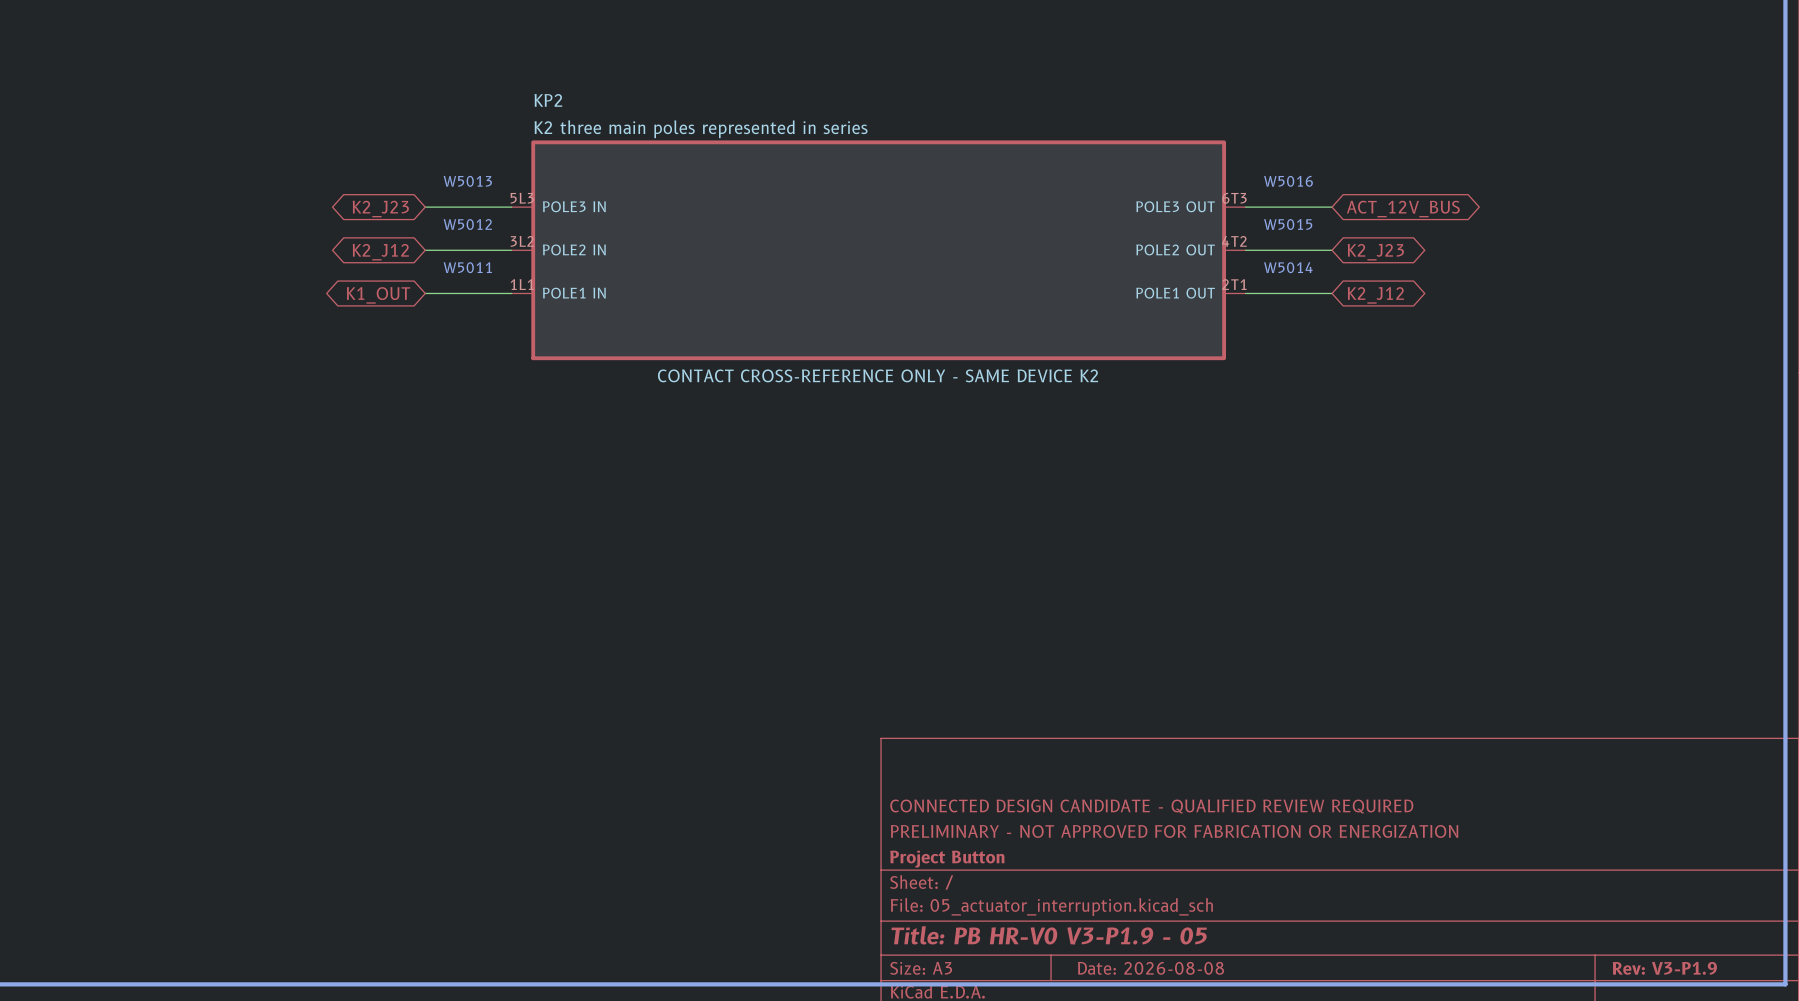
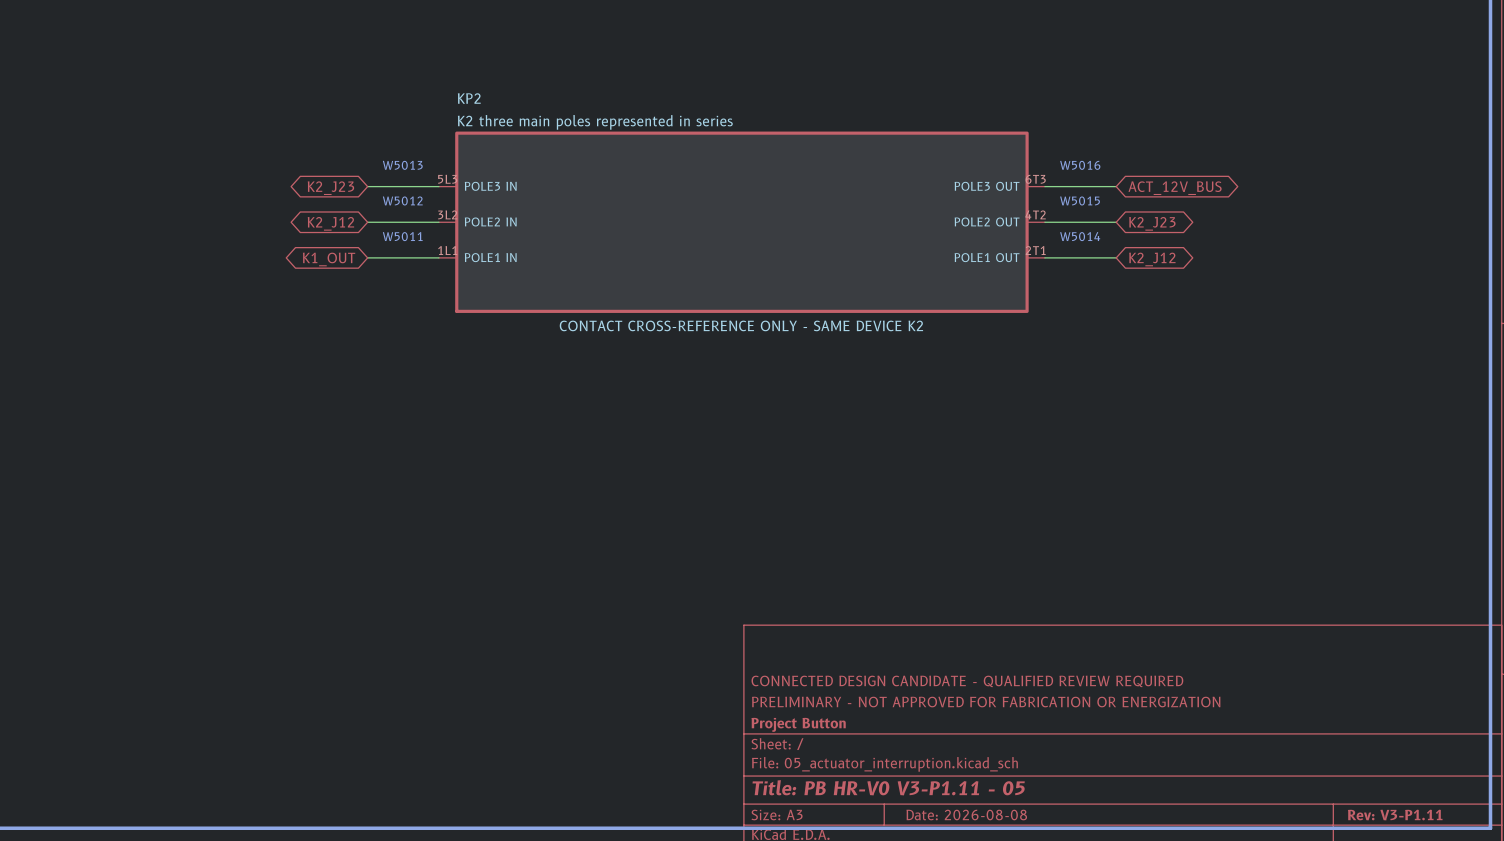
title block: Title: PB HR-V0 V3-P1.9 - 05 (1049, 935) -> Title: PB HR-V0 V3-P1.11 - 05 (888, 787)
title block: Rev: V3-P1.9 (1664, 968) -> Rev: V3-P1.11 (1395, 815)

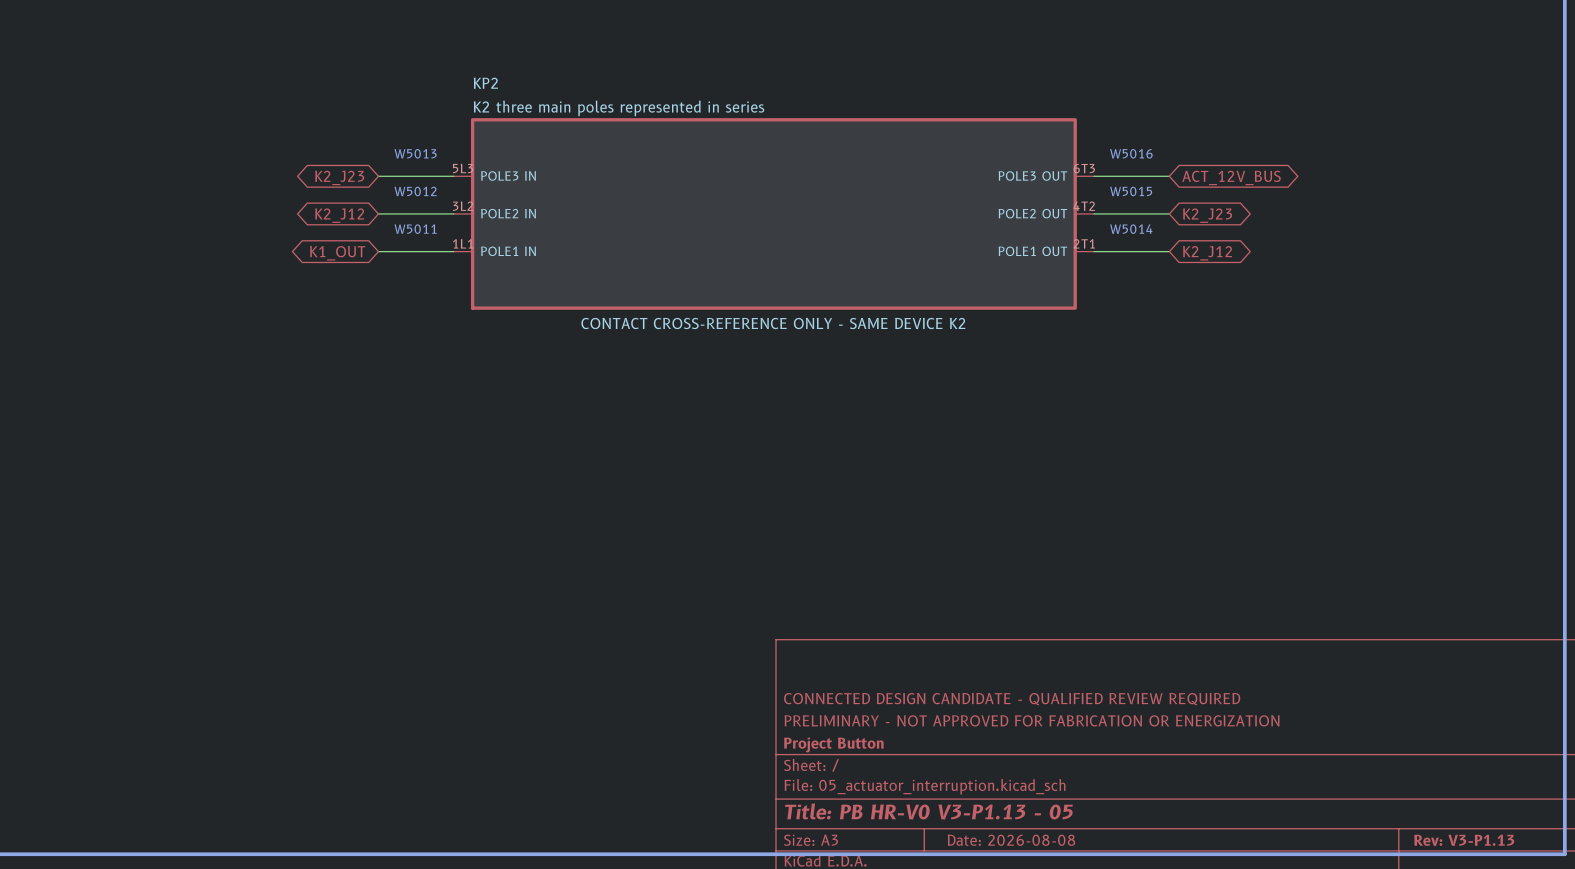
title block: Title: PB HR-V0 V3-P1.11 - 05 (888, 787) -> Title: PB HR-V0 V3-P1.13 - 05 (928, 811)
title block: Rev: V3-P1.11 (1395, 815) -> Rev: V3-P1.13 (1464, 840)

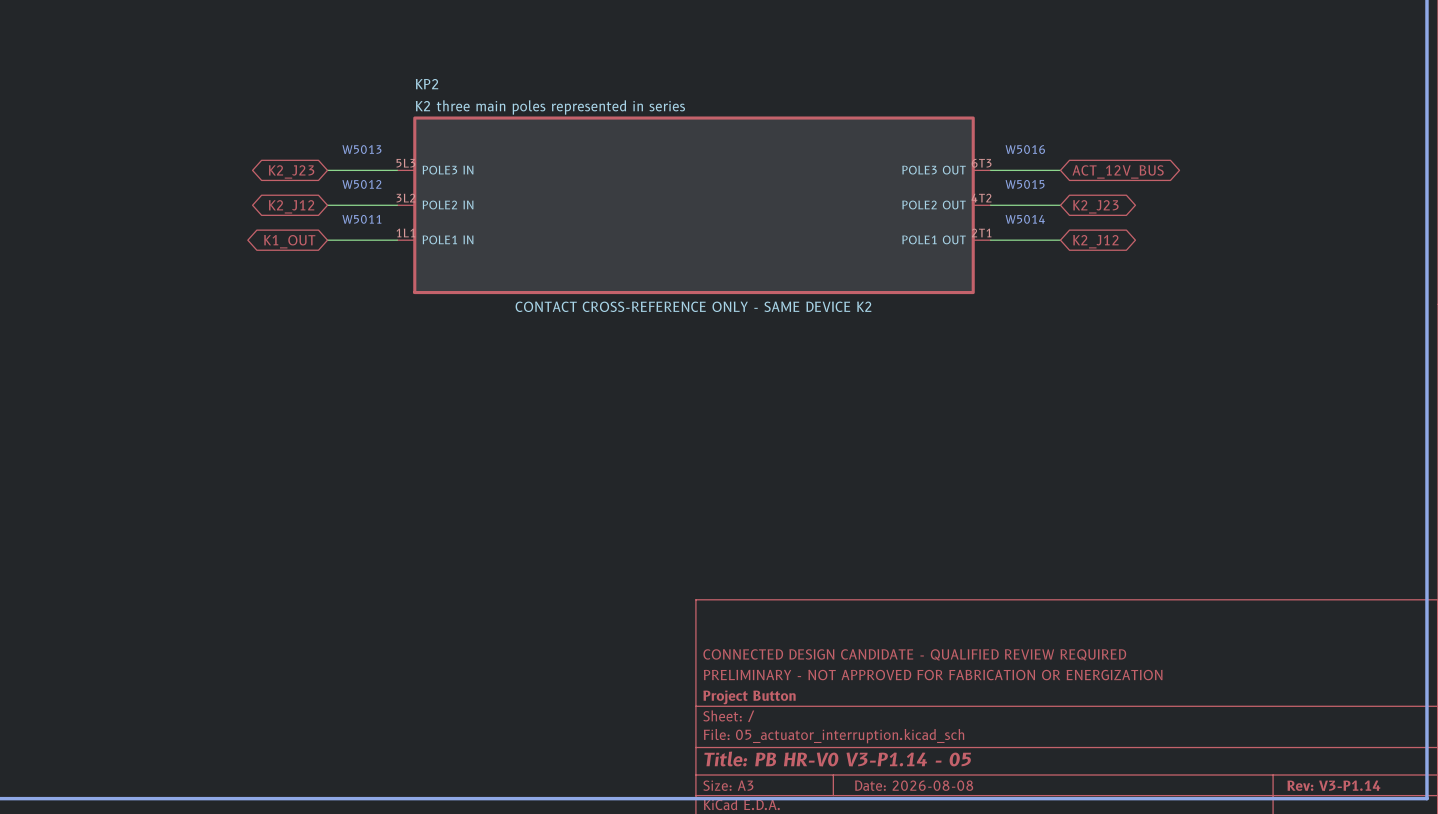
title block: Title: PB HR-V0 V3-P1.13 - 05 (928, 811) -> Title: PB HR-V0 V3-P1.14 - 05 (837, 759)
title block: Rev: V3-P1.13 (1464, 840) -> Rev: V3-P1.14 (1333, 785)

